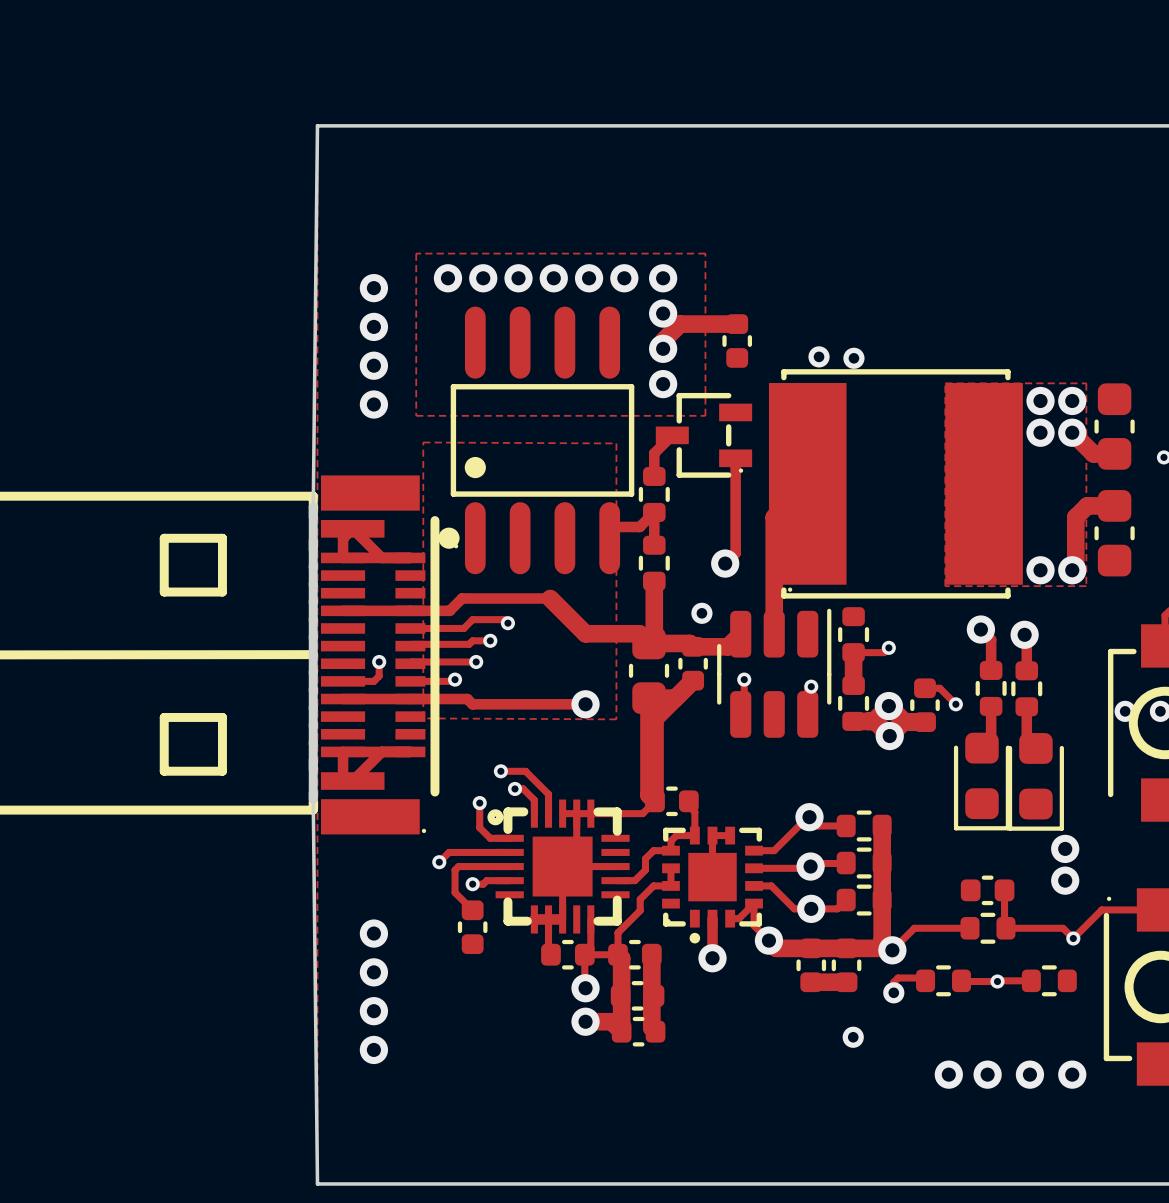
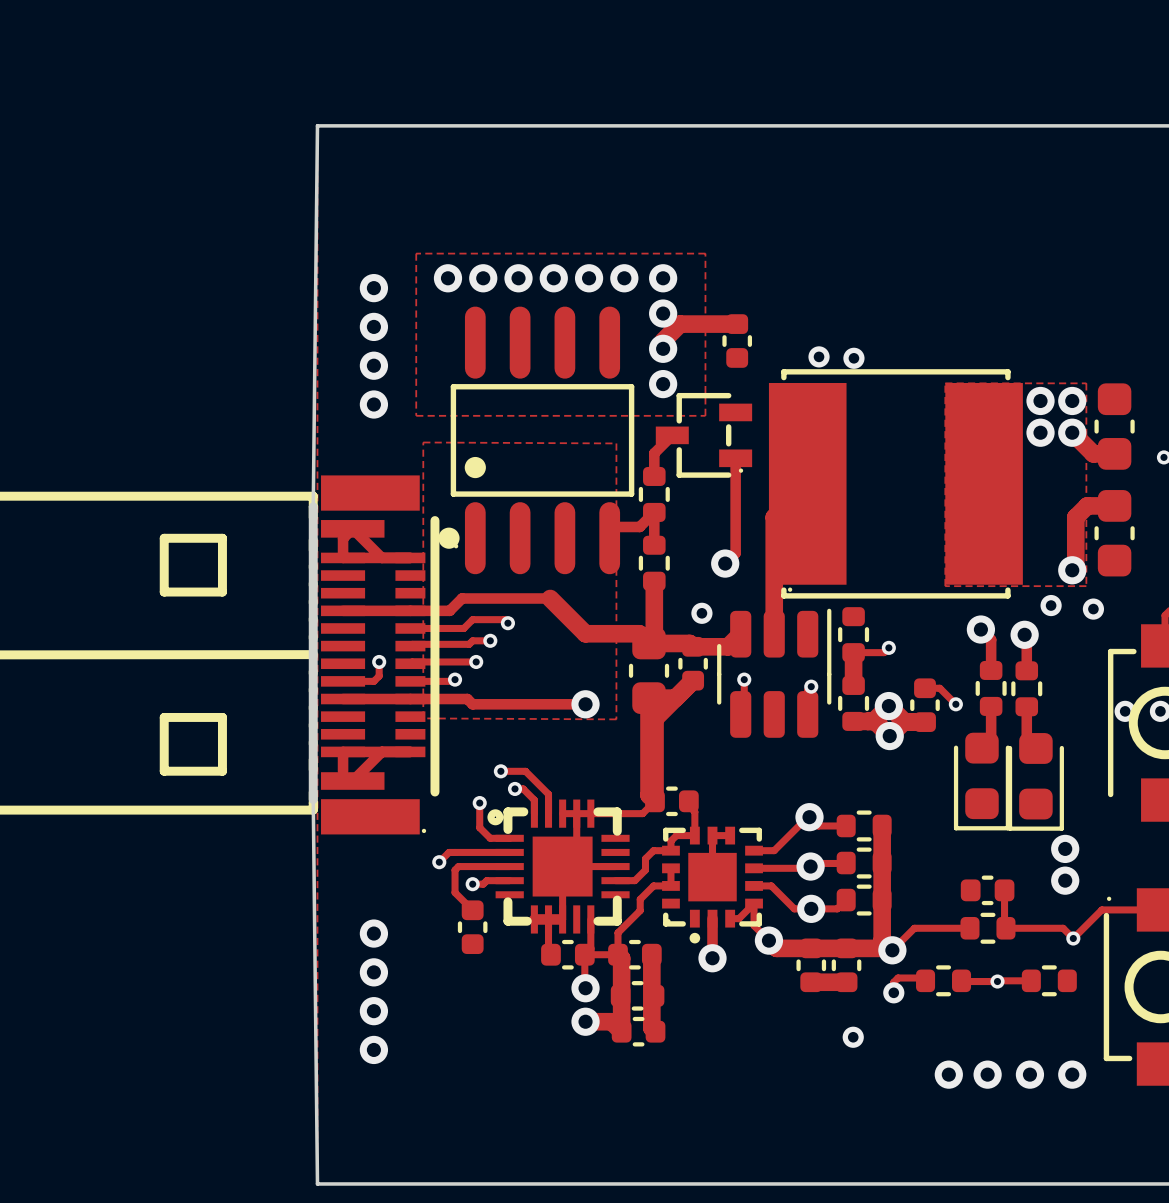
via: (1040, 570) -> none
via: none -> (1051, 605)
via: none -> (1093, 609)

